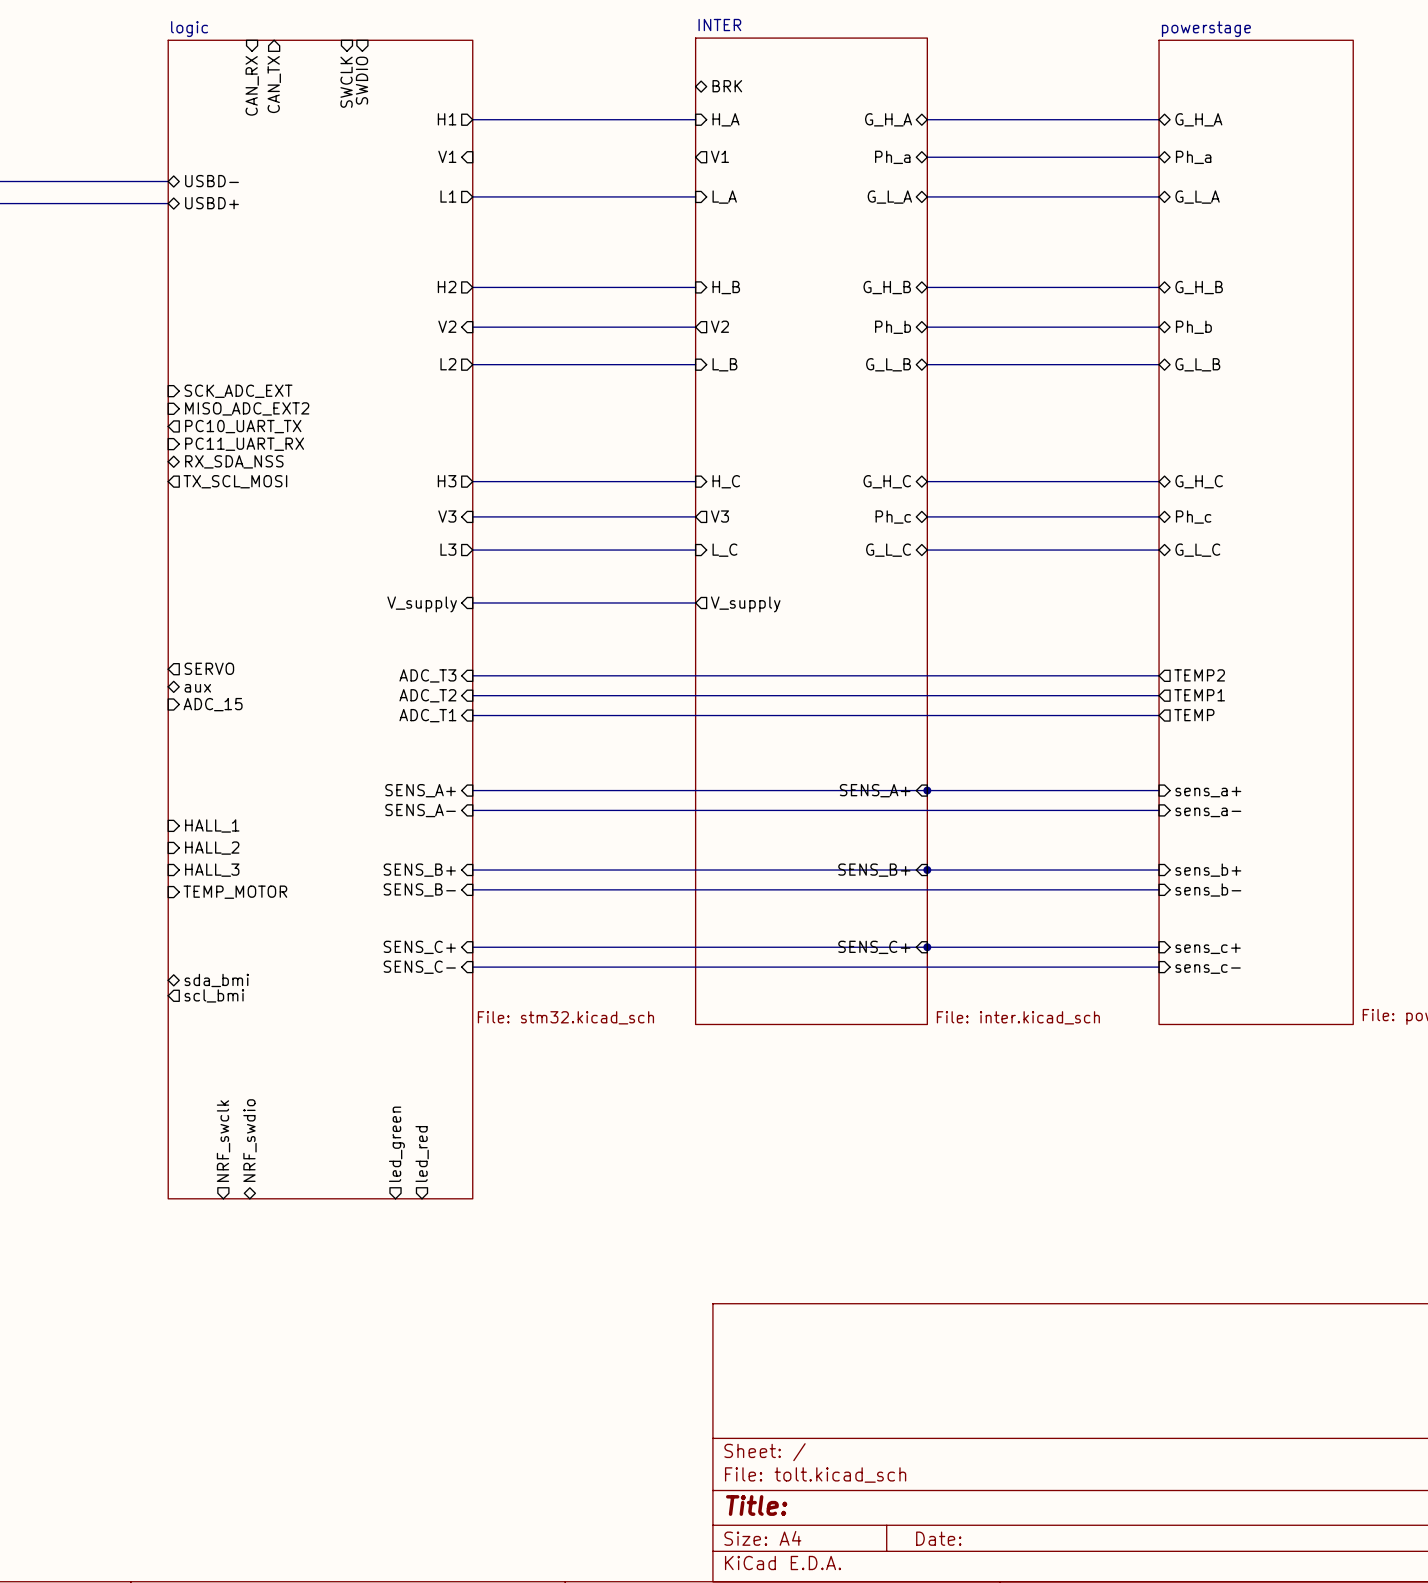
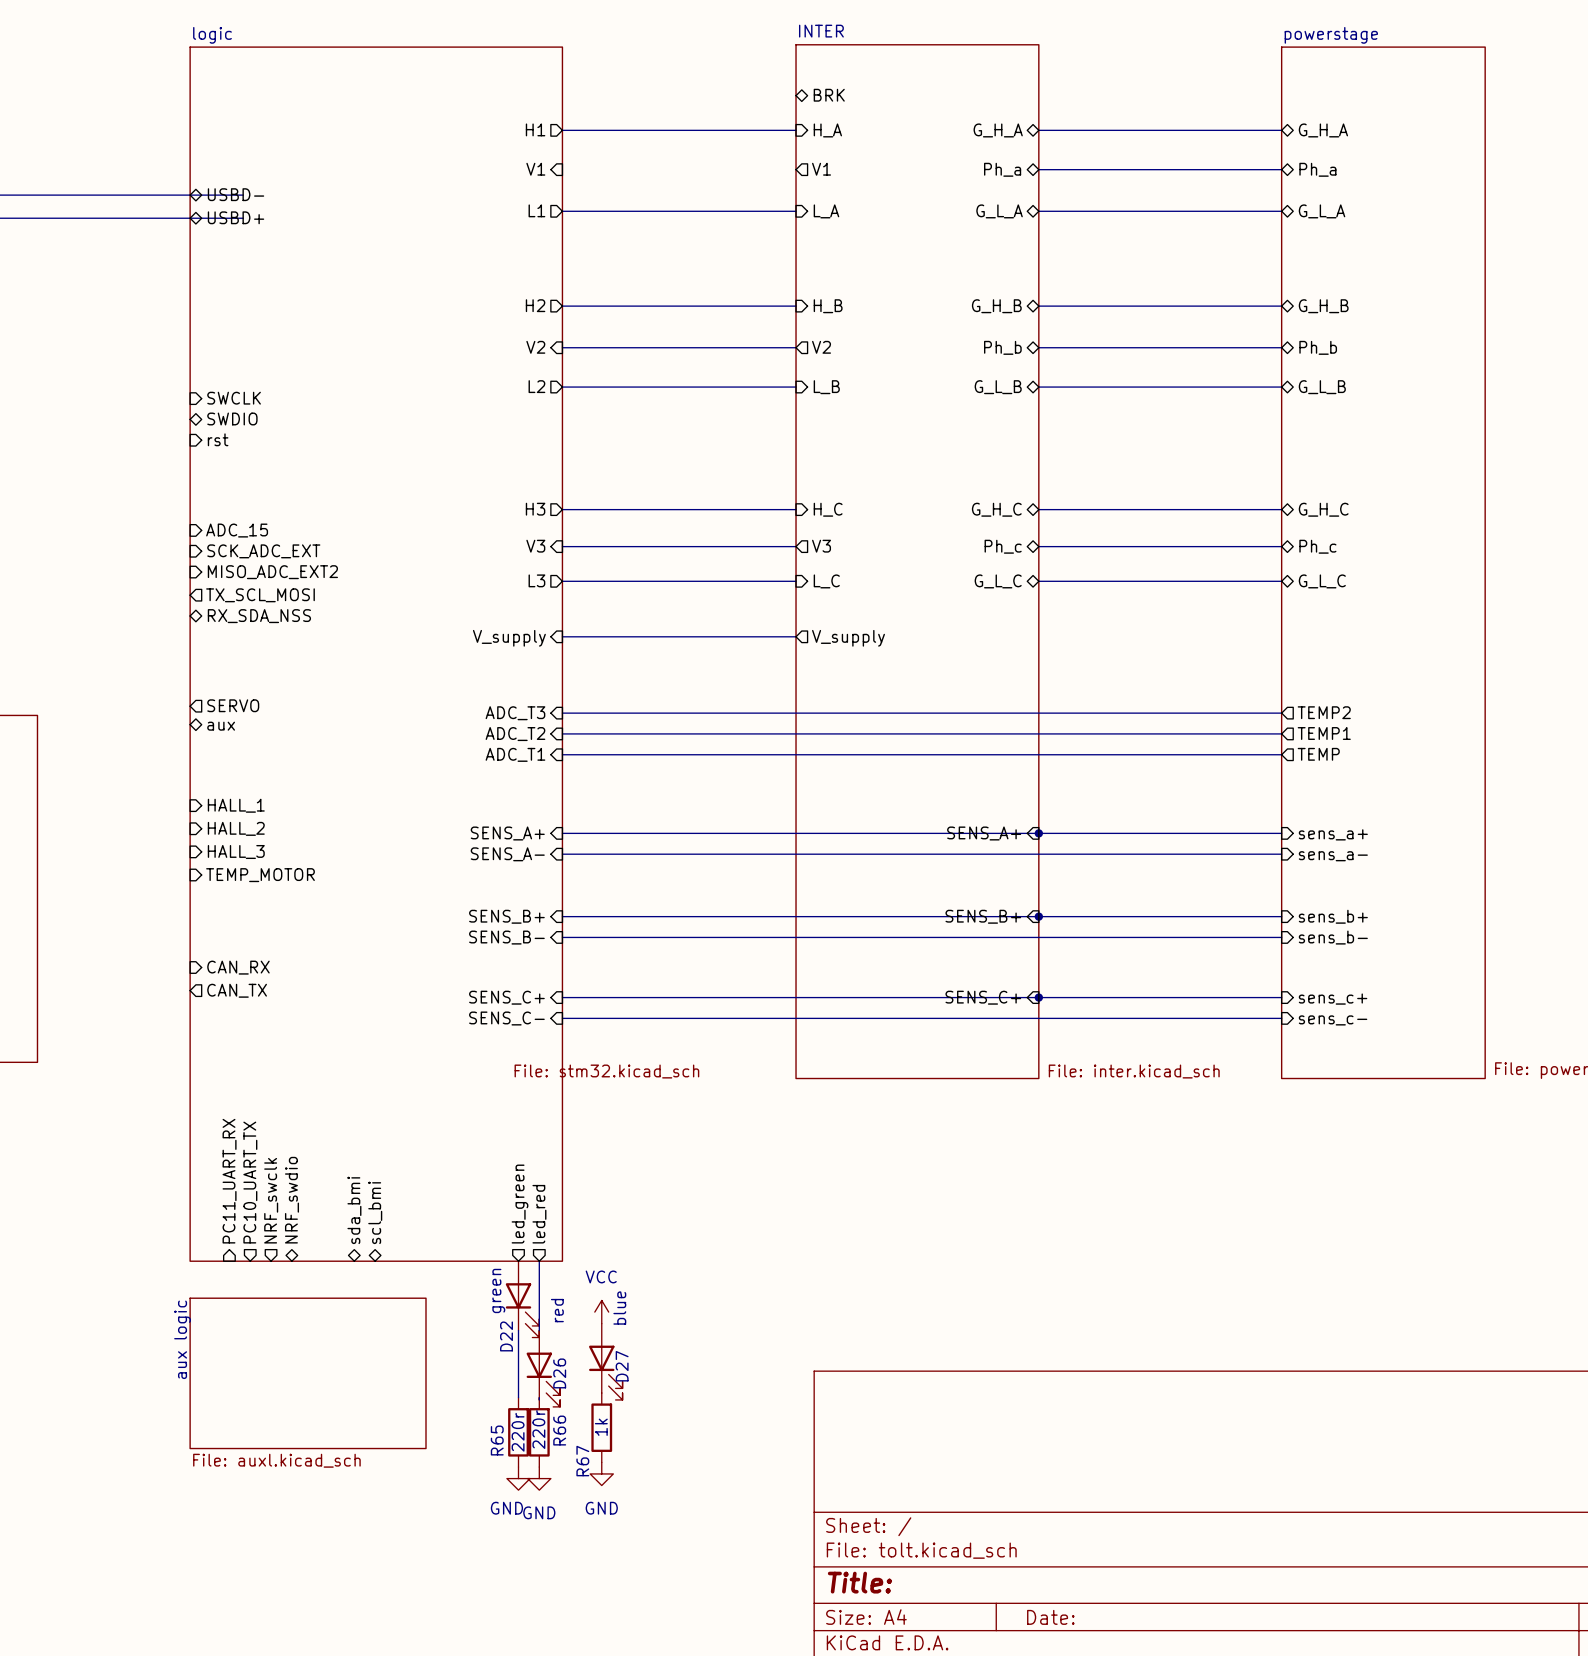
sheet pin: SWDIO (361, 80) -> none
sheet pin: SWCLK (346, 82) -> none
sheet pin: CAN_TX (274, 84) -> none
sheet pin: CAN_RX (252, 85) -> none
sheet pin position: USBD- (212, 181) -> USBD- (236, 194)
sheet pin position: USBD+ (212, 203) -> USBD+ (236, 217)
sheet pin: none -> SWCLK (234, 398)
sheet pin position: SCK_ADC_EXT (238, 391) -> SCK_ADC_EXT (263, 551)
sheet pin: none -> SWDIO (232, 418)
sheet pin position: MISO_ADC_EXT2 (247, 408) -> MISO_ADC_EXT2 (272, 572)
sheet pin: none -> rst (218, 439)
sheet pin: PC10_UART_TX (243, 426) -> none
sheet pin: PC11_UART_RX (244, 444) -> none
sheet pin position: RX_SDA_NSS (234, 461) -> RX_SDA_NSS (259, 616)
sheet pin position: TX_SCL_MOSI (235, 481) -> TX_SCL_MOSI (260, 595)
sheet logic: none -> File: stm32.kicad_sch (376, 654)
sheet logic: File: stm32.kicad_sch (320, 619) -> none
sheet pin position: SERVO (209, 668) -> SERVO (233, 705)
sheet pin position: aux (197, 688) -> aux (221, 726)
sheet pin position: ADC_15 (213, 704) -> ADC_15 (237, 530)
sheet pin position: HALL_1 (212, 825) -> HALL_1 (236, 805)
sheet pin position: HALL_2 (212, 848) -> HALL_2 (236, 828)
sheet pin position: HALL_3 (212, 870) -> HALL_3 (236, 851)
sheet pin position: TEMP_MOTOR (235, 892) -> TEMP_MOTOR (260, 875)
sheet pin: none -> CAN_RX (238, 967)
sheet pin: none -> CAN_TX (237, 990)
sheet pin: sda_bmi (216, 980) -> none
sheet pin: scl_bmi (214, 995) -> none
sheet pin: none -> PC11_UART_RX (229, 1181)
sheet pin: none -> PC10_UART_TX (250, 1182)
sheet pin position: NRF_swdio (249, 1140) -> NRF_swdio (291, 1200)
sheet pin position: NRF_swclk (223, 1141) -> NRF_swclk (271, 1200)
sheet pin position: led_green (396, 1144) -> led_green (520, 1204)
sheet pin: none -> sda_bmi (354, 1210)
sheet pin: none -> scl_bmi (375, 1212)
sheet pin position: led_red (422, 1153) -> led_red (539, 1214)
wire: none -> (539, 1261) (539, 1330)
D22: none -> green (522, 1299)
power symbol: none -> VCC (601, 1312)
wire: none -> (518, 1330) (518, 1397)
D27: none -> blue (605, 1361)
D26: none -> red (543, 1368)
sheet aux logic: none -> File: auxl.kicad_sch (308, 1373)
wire: none -> (539, 1397) (539, 1399)
R67: none -> 1k (601, 1427)
R65: none -> 220r (518, 1432)
R66: none -> 220r (539, 1432)
power symbol: none -> GND (601, 1473)
power symbol: none -> GND (518, 1478)
power symbol: none -> GND (539, 1478)

